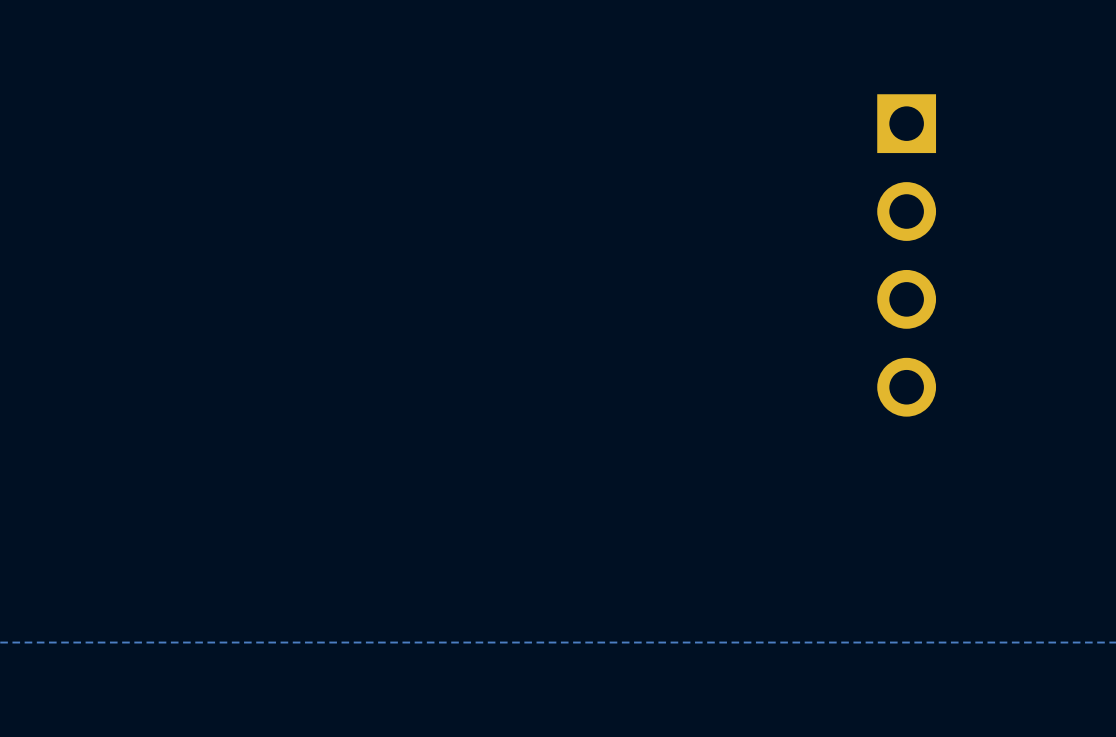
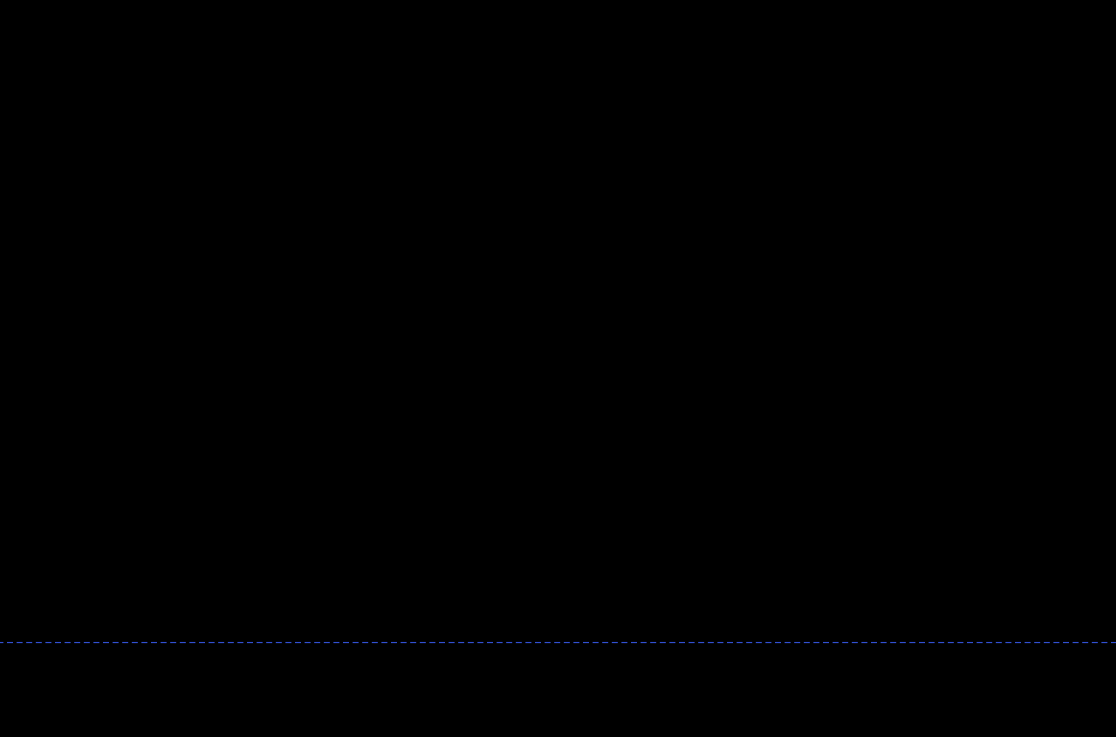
part: (906, 255) -> none

